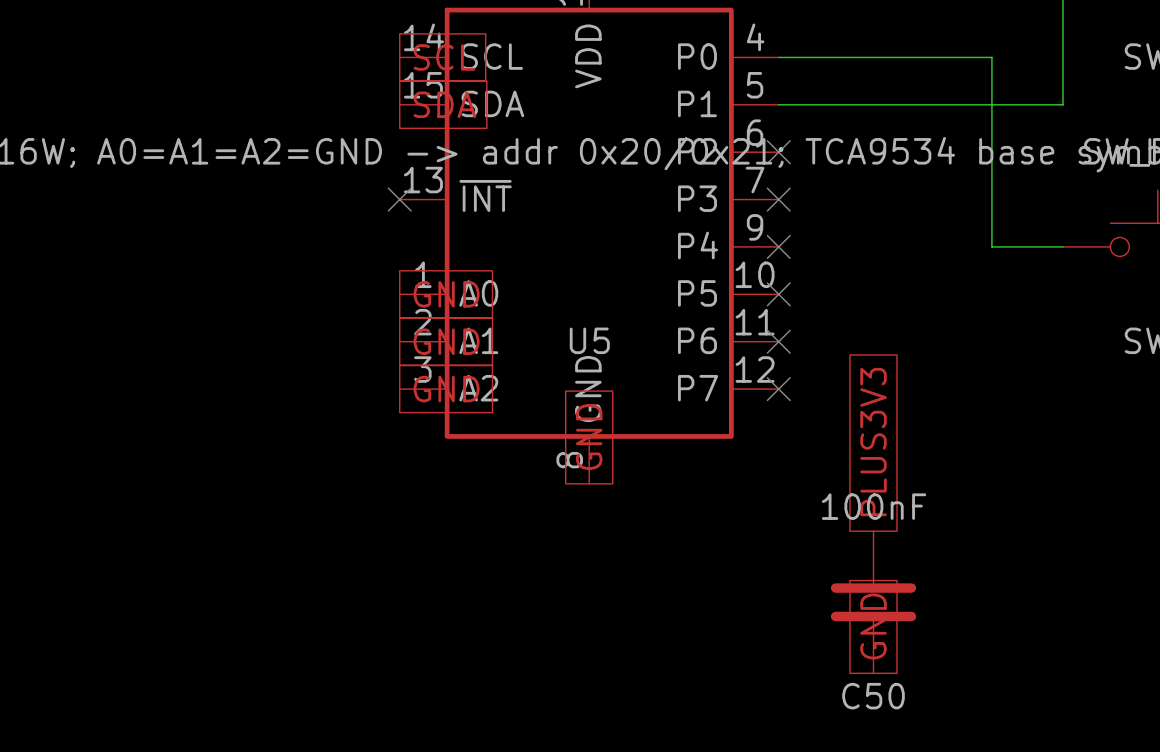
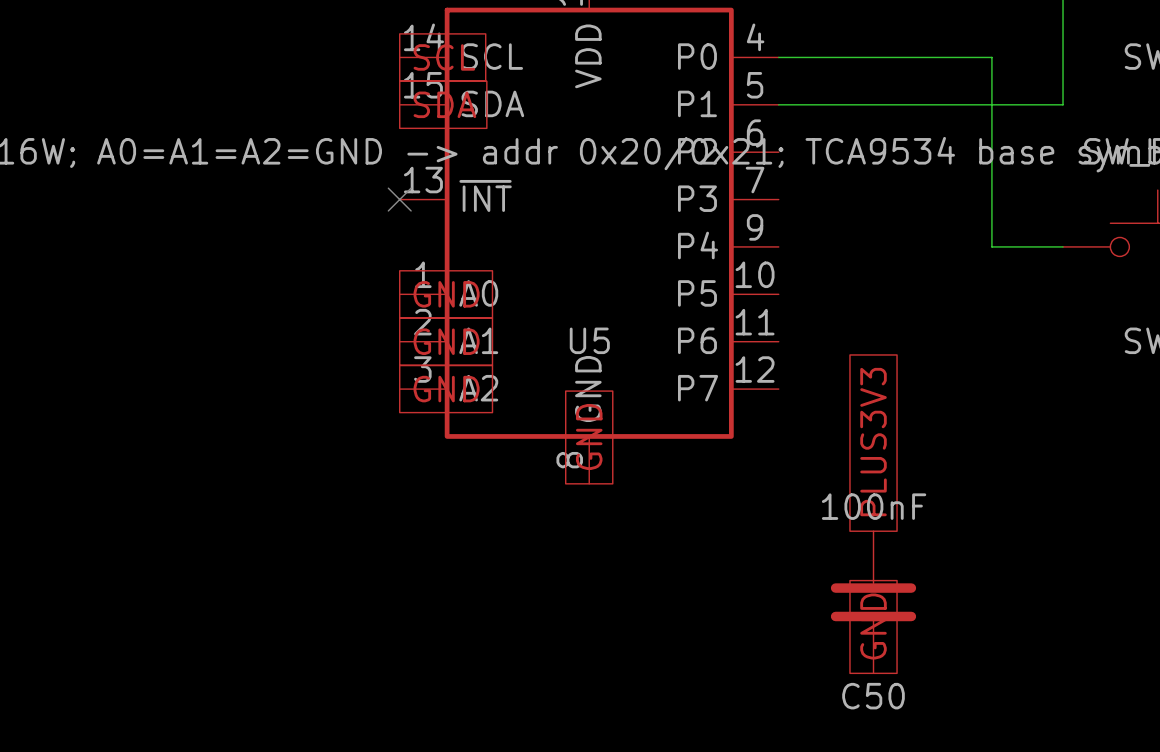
no-connect mark: (778, 152) -> none
no-connect mark: (778, 199) -> none
no-connect mark: (778, 246) -> none
no-connect mark: (778, 294) -> none
no-connect mark: (778, 341) -> none
no-connect mark: (778, 389) -> none

